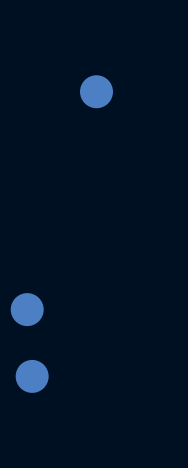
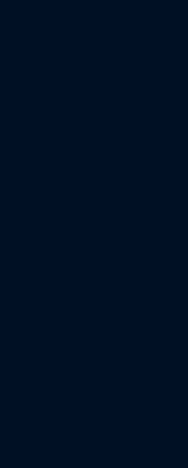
part: (96, 91) -> none
part: (27, 309) -> none
part: (32, 376) -> none

